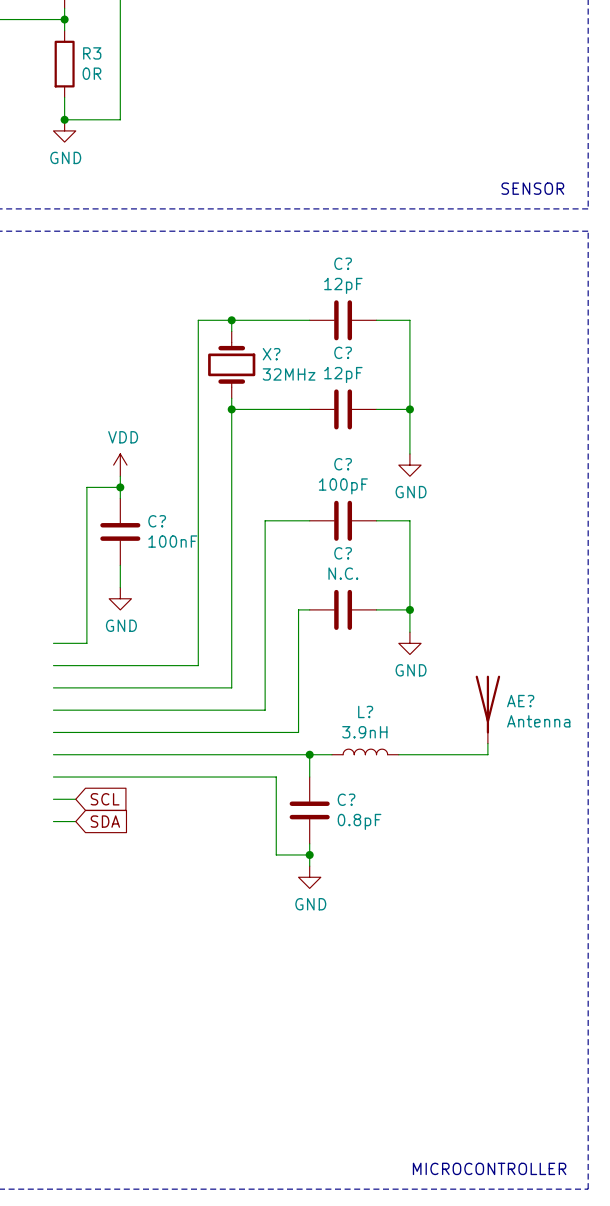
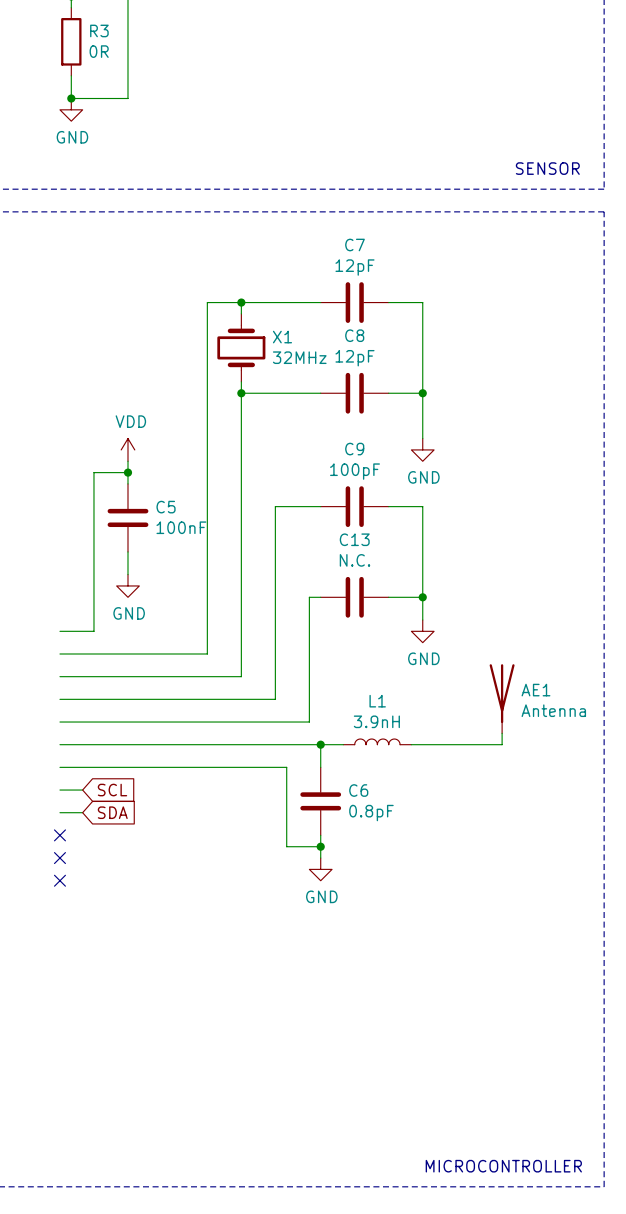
C? name: C? (343, 263) -> C7 (354, 245)
C? name: C? (343, 352) -> C8 (354, 335)
X? name: X? (271, 354) -> X1 (282, 337)
C? name: C? (343, 464) -> C9 (354, 449)
C? name: C? (157, 521) -> C5 (166, 507)
C? name: C? (343, 553) -> C13 (354, 539)
AE? name: AE? (520, 701) -> AE1 (535, 690)
L? name: L? (365, 711) -> L1 (377, 701)
C? name: C? (346, 799) -> C6 (358, 790)
no-connect mark: none -> (59, 835)
no-connect mark: none -> (59, 858)
no-connect mark: none -> (59, 880)

